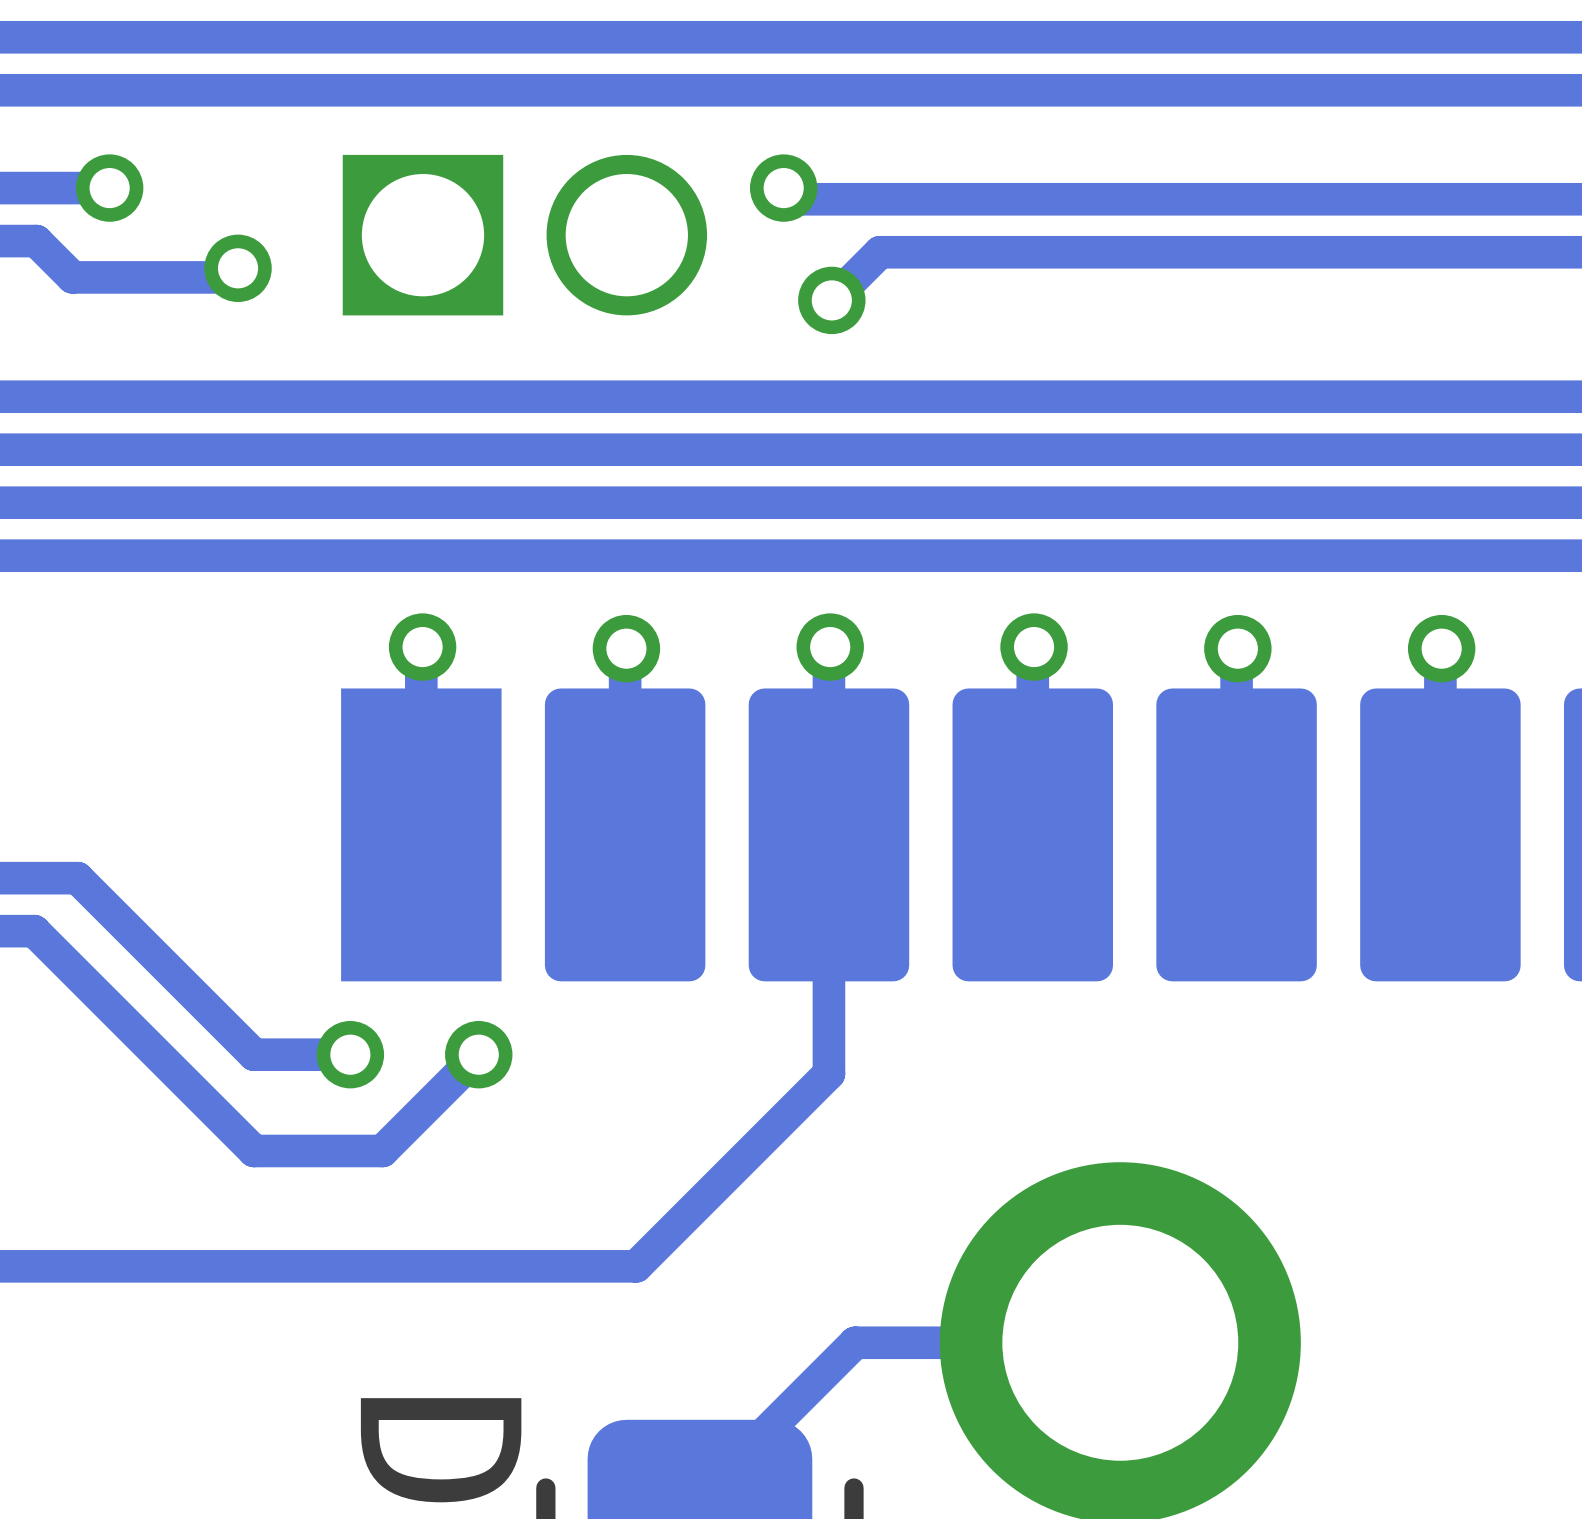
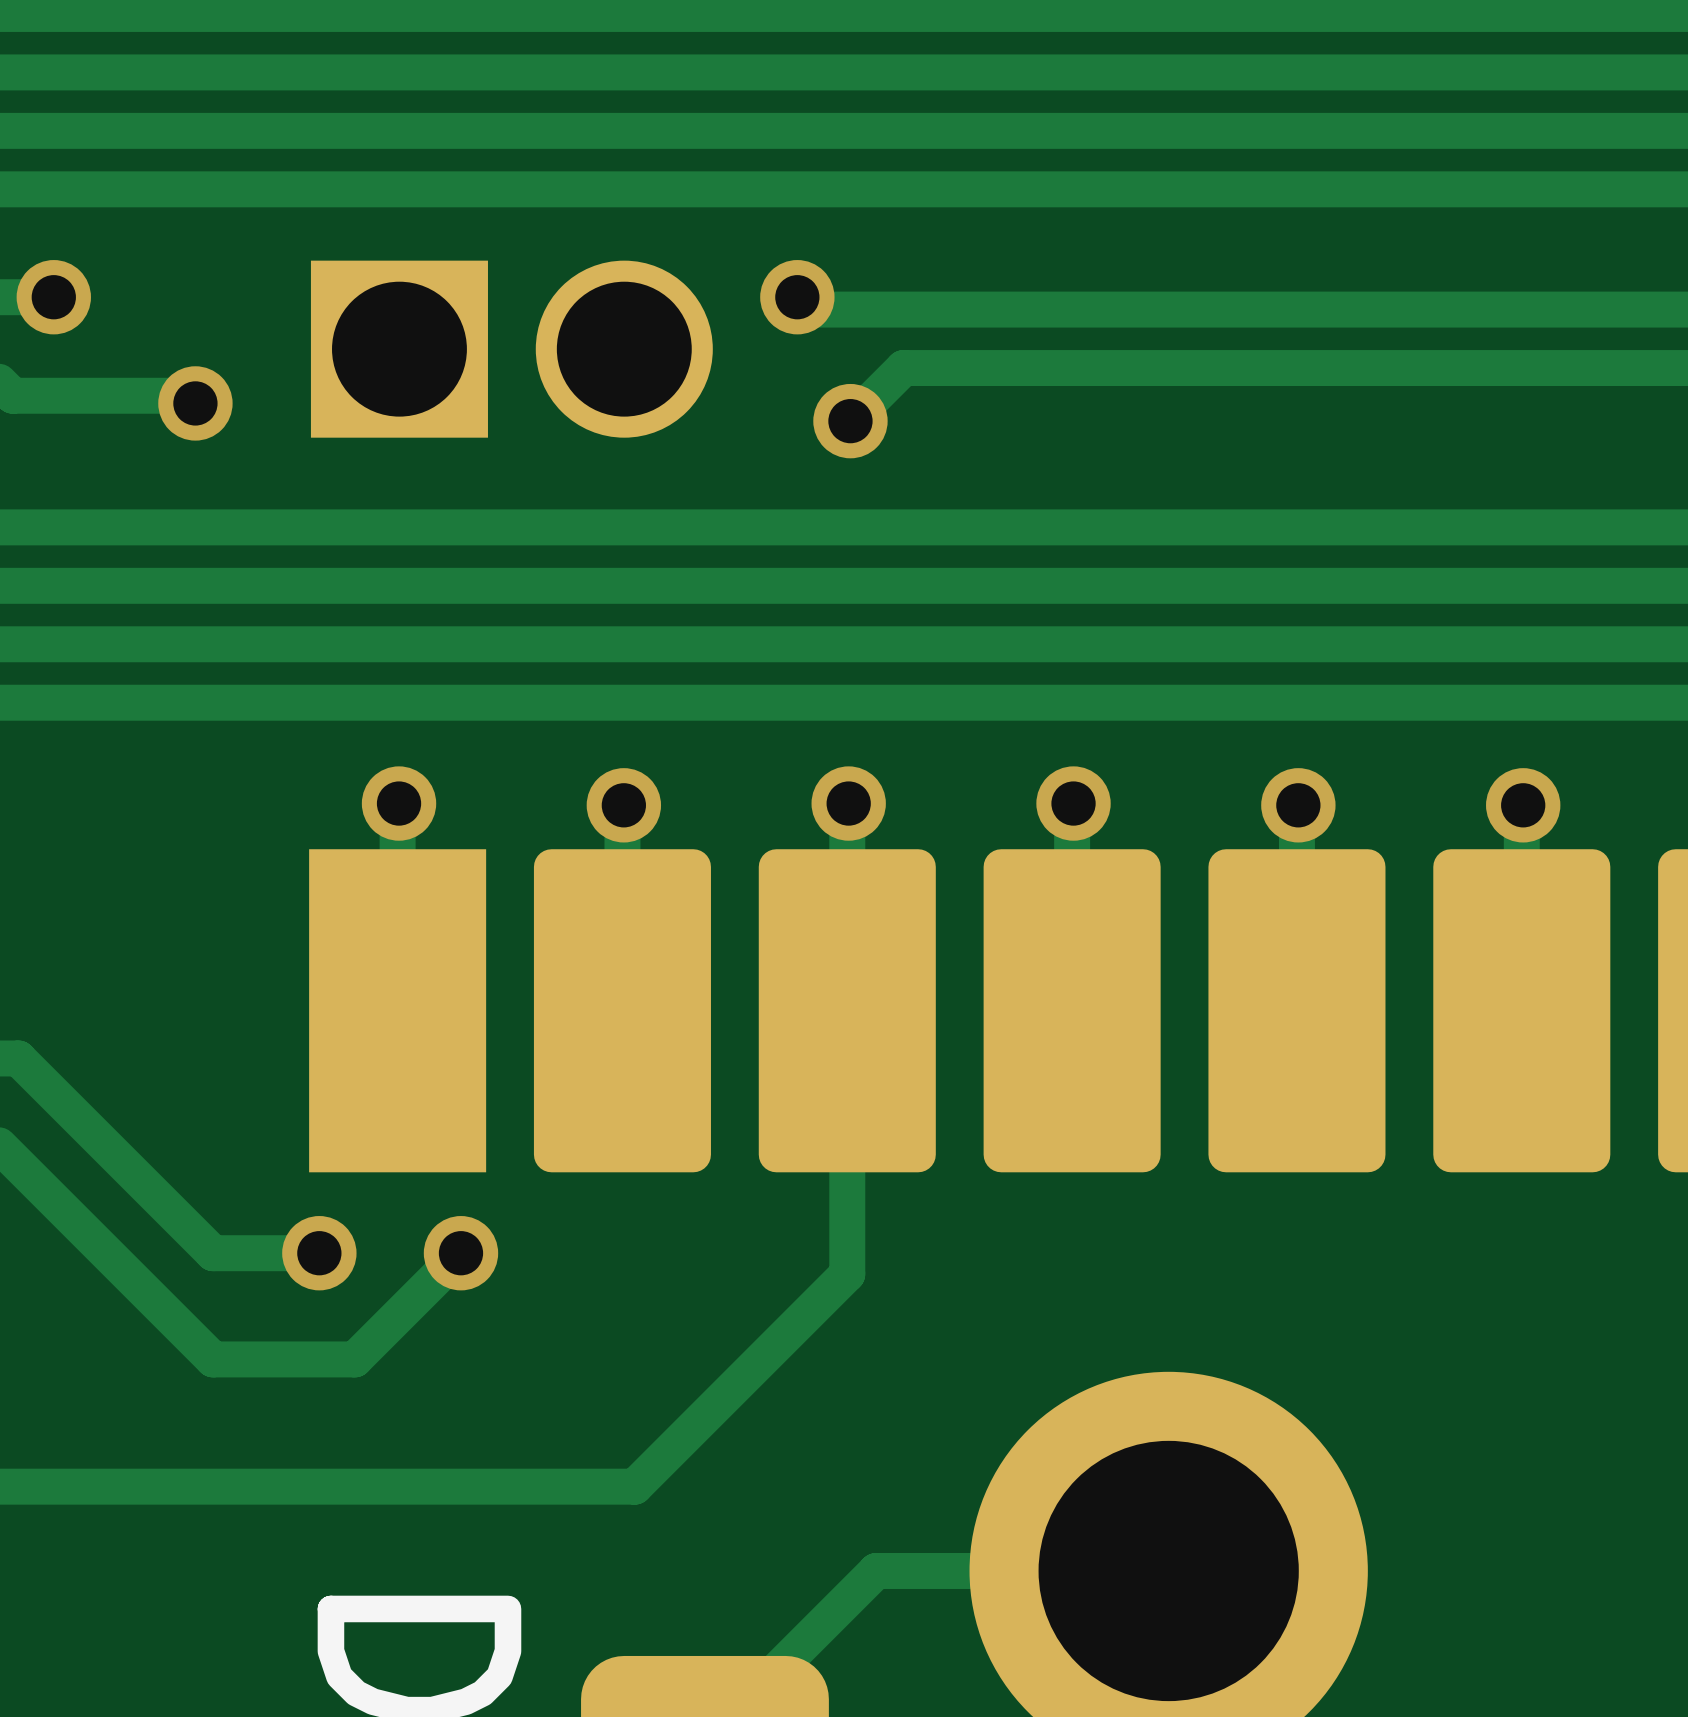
via position: (238, 268) -> (195, 403)

